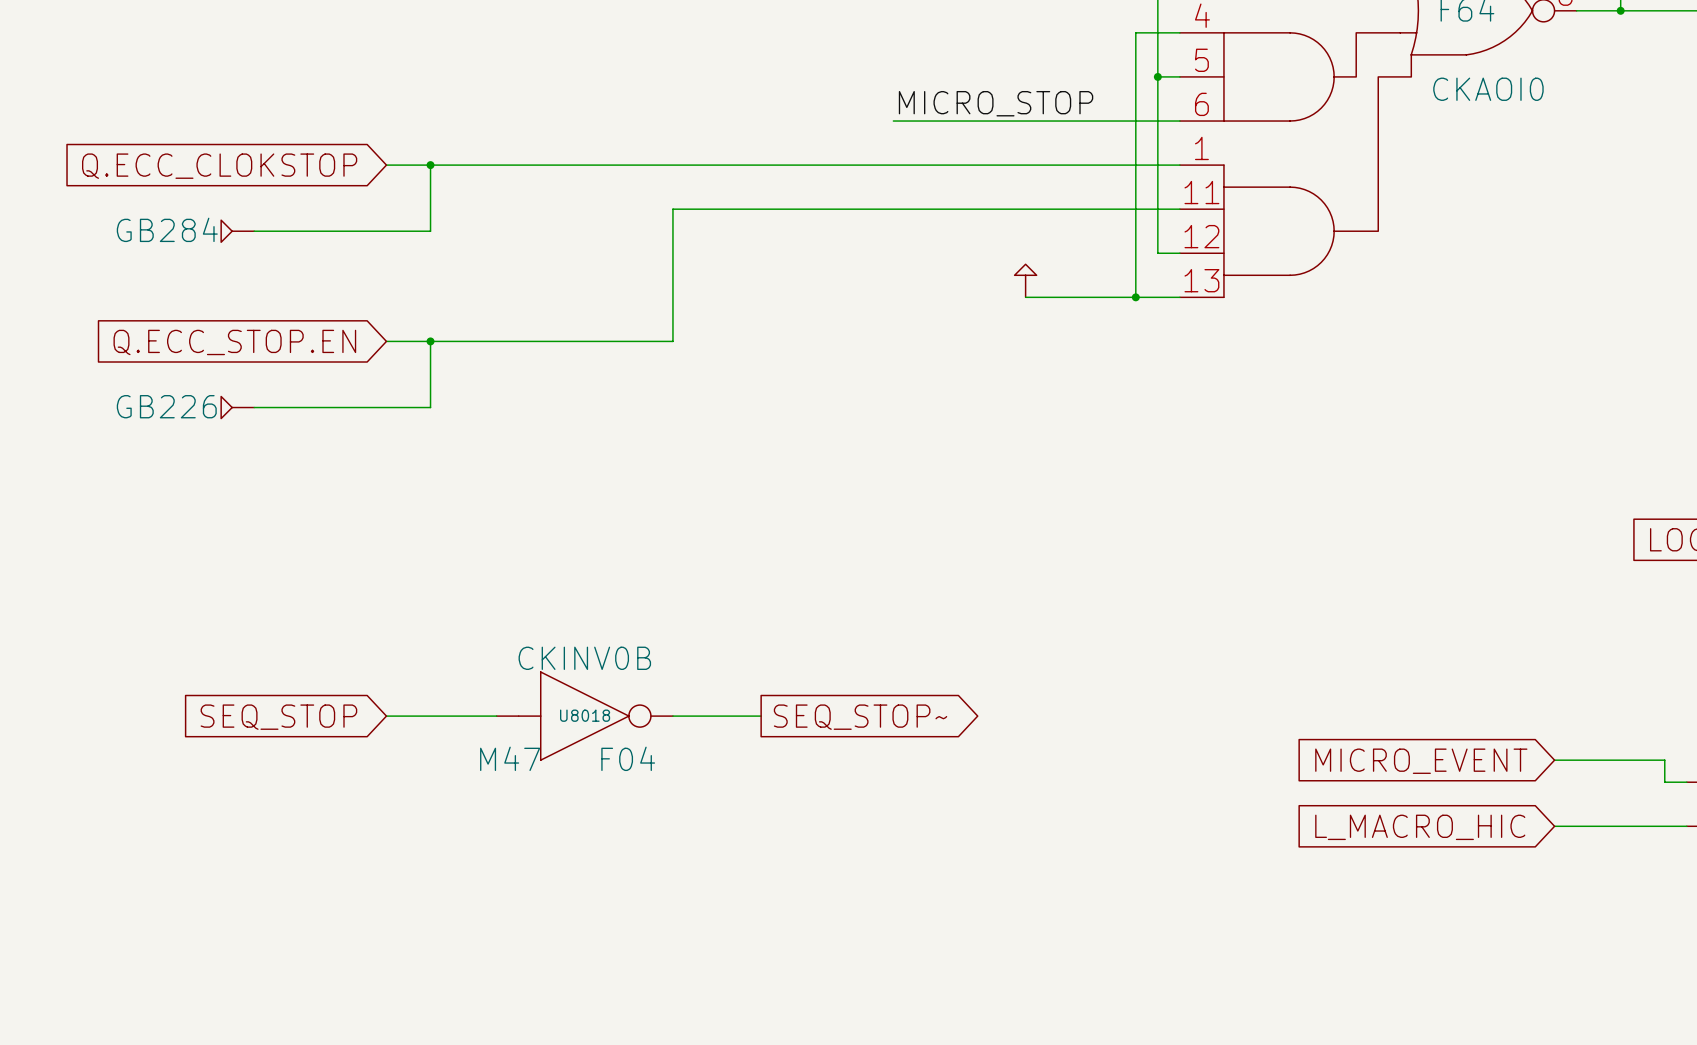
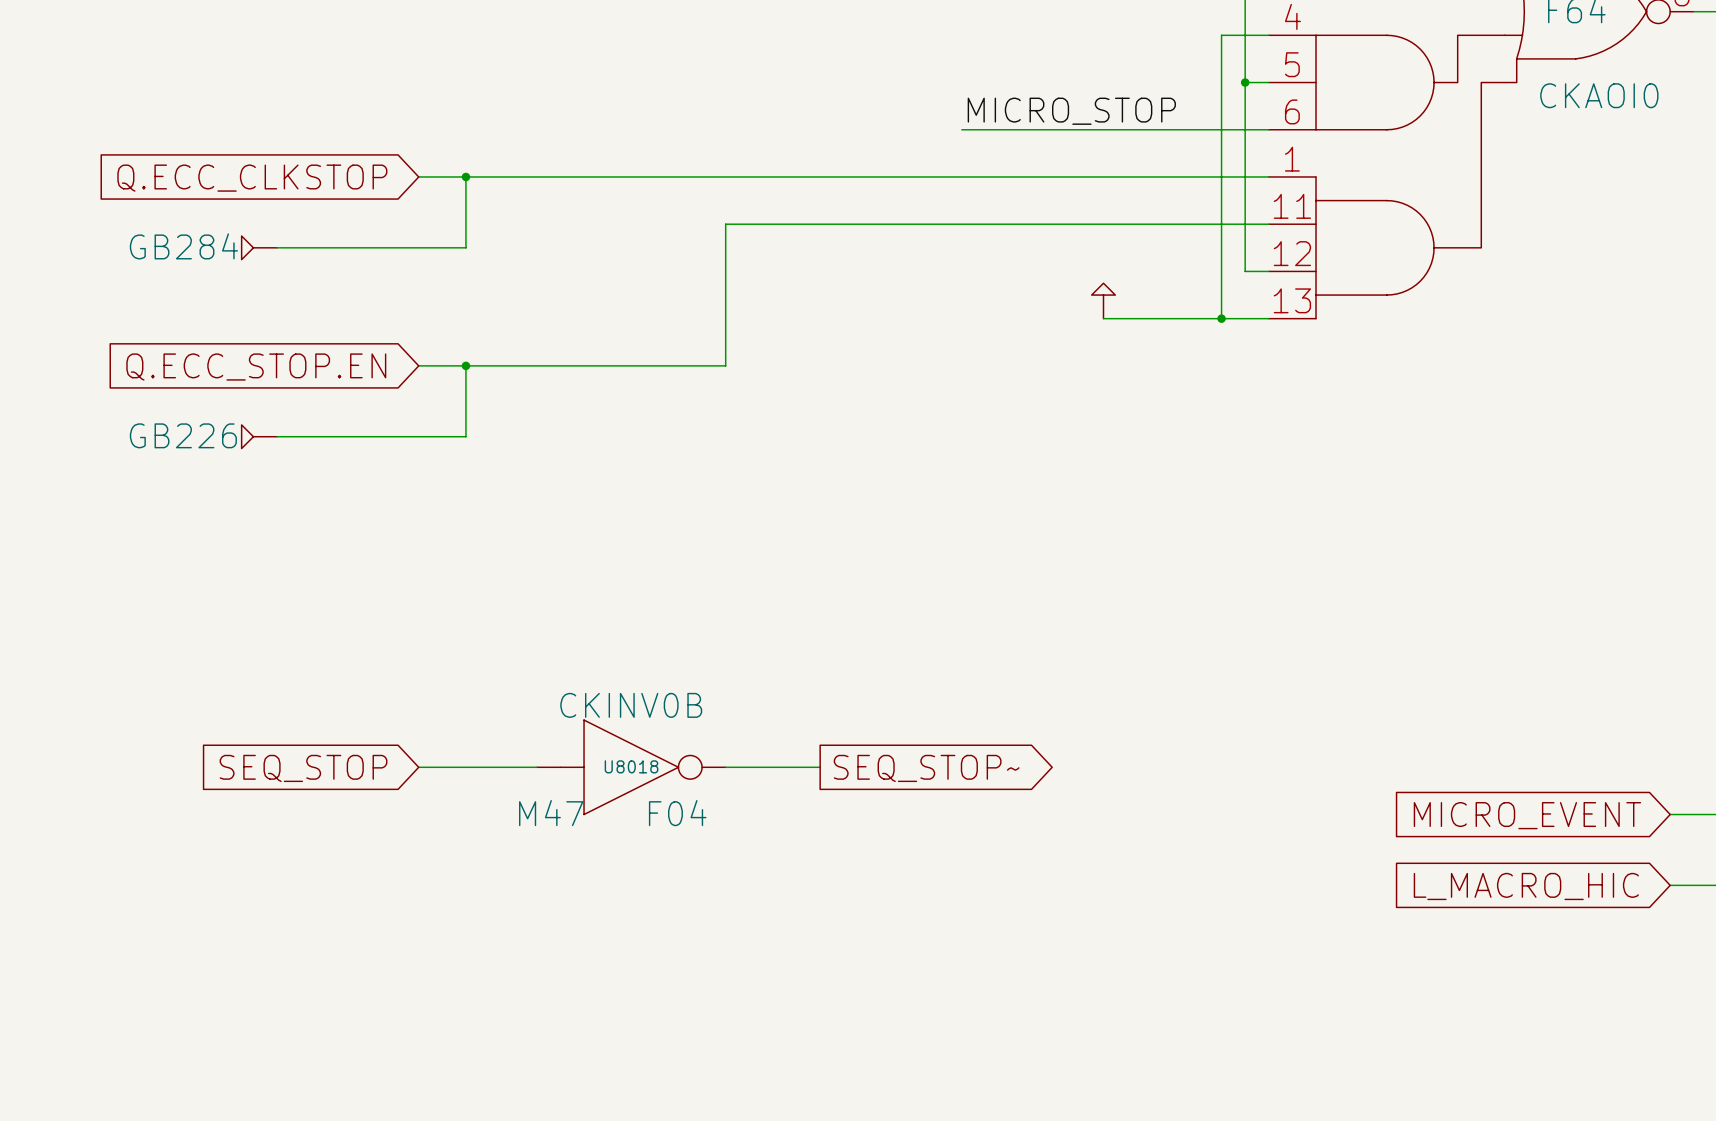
global label: Q.ECC_CLOKSTOP (219, 166) -> Q.ECC_CLKSTOP (252, 178)

